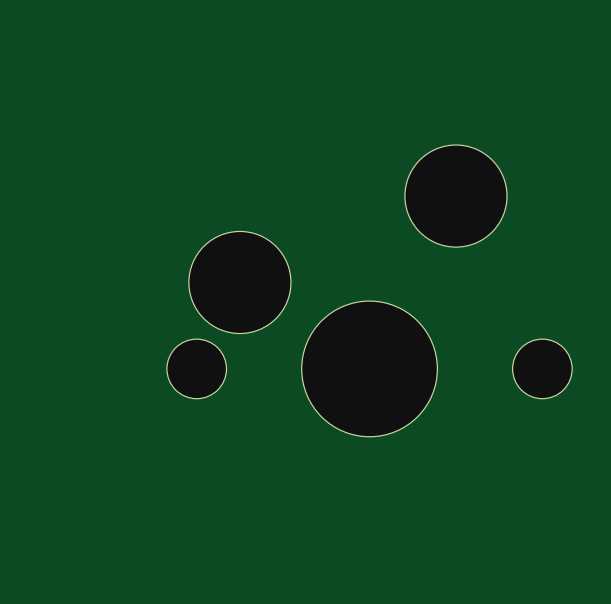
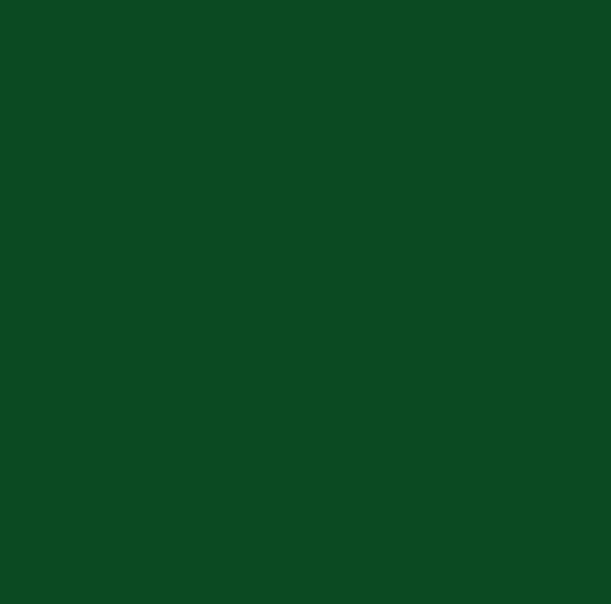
part: (369, 290) -> none

